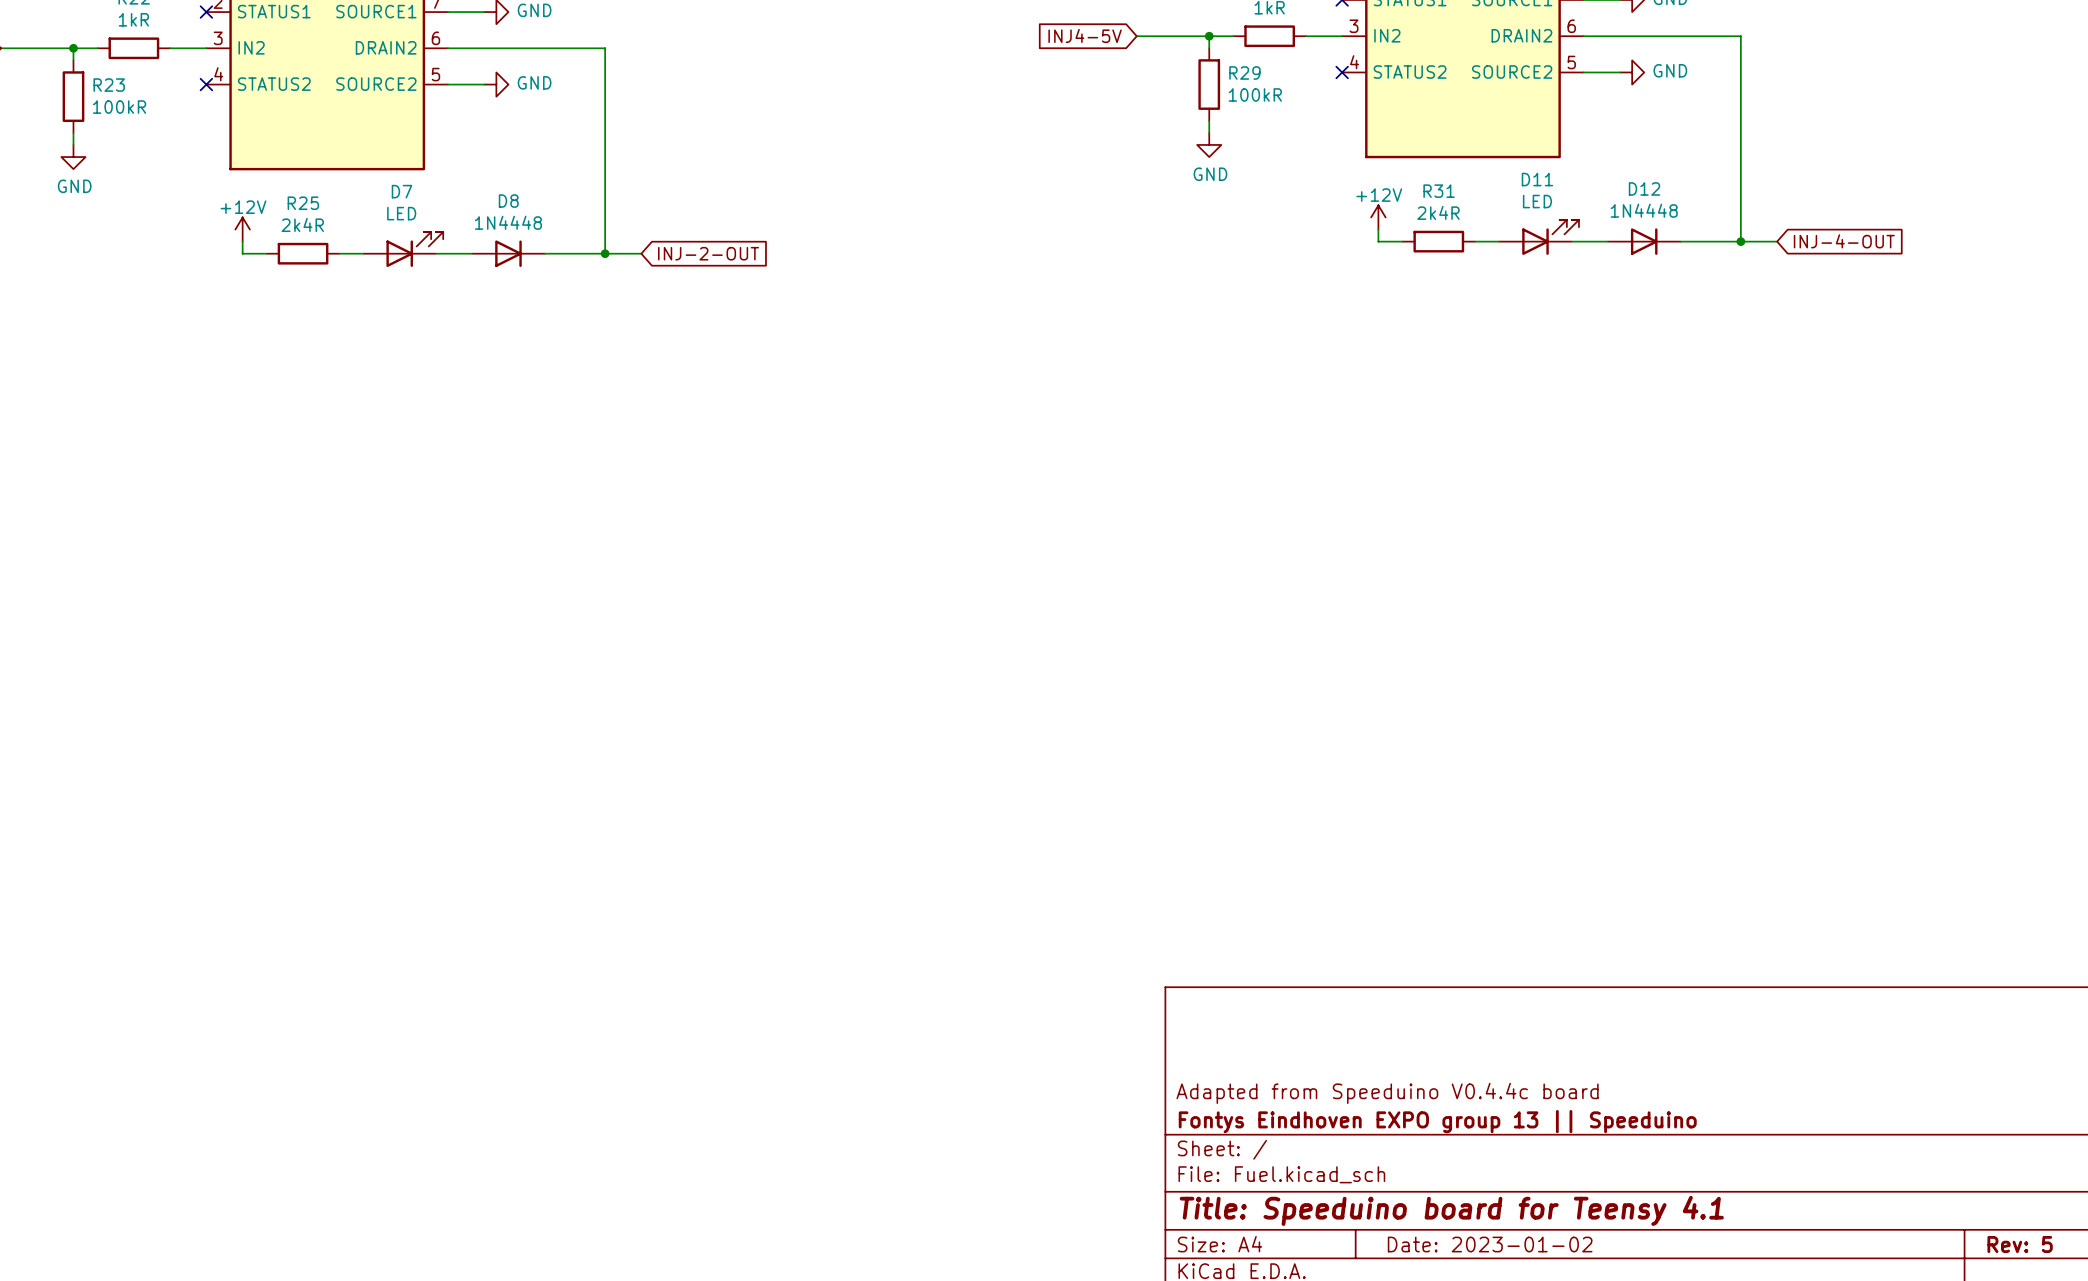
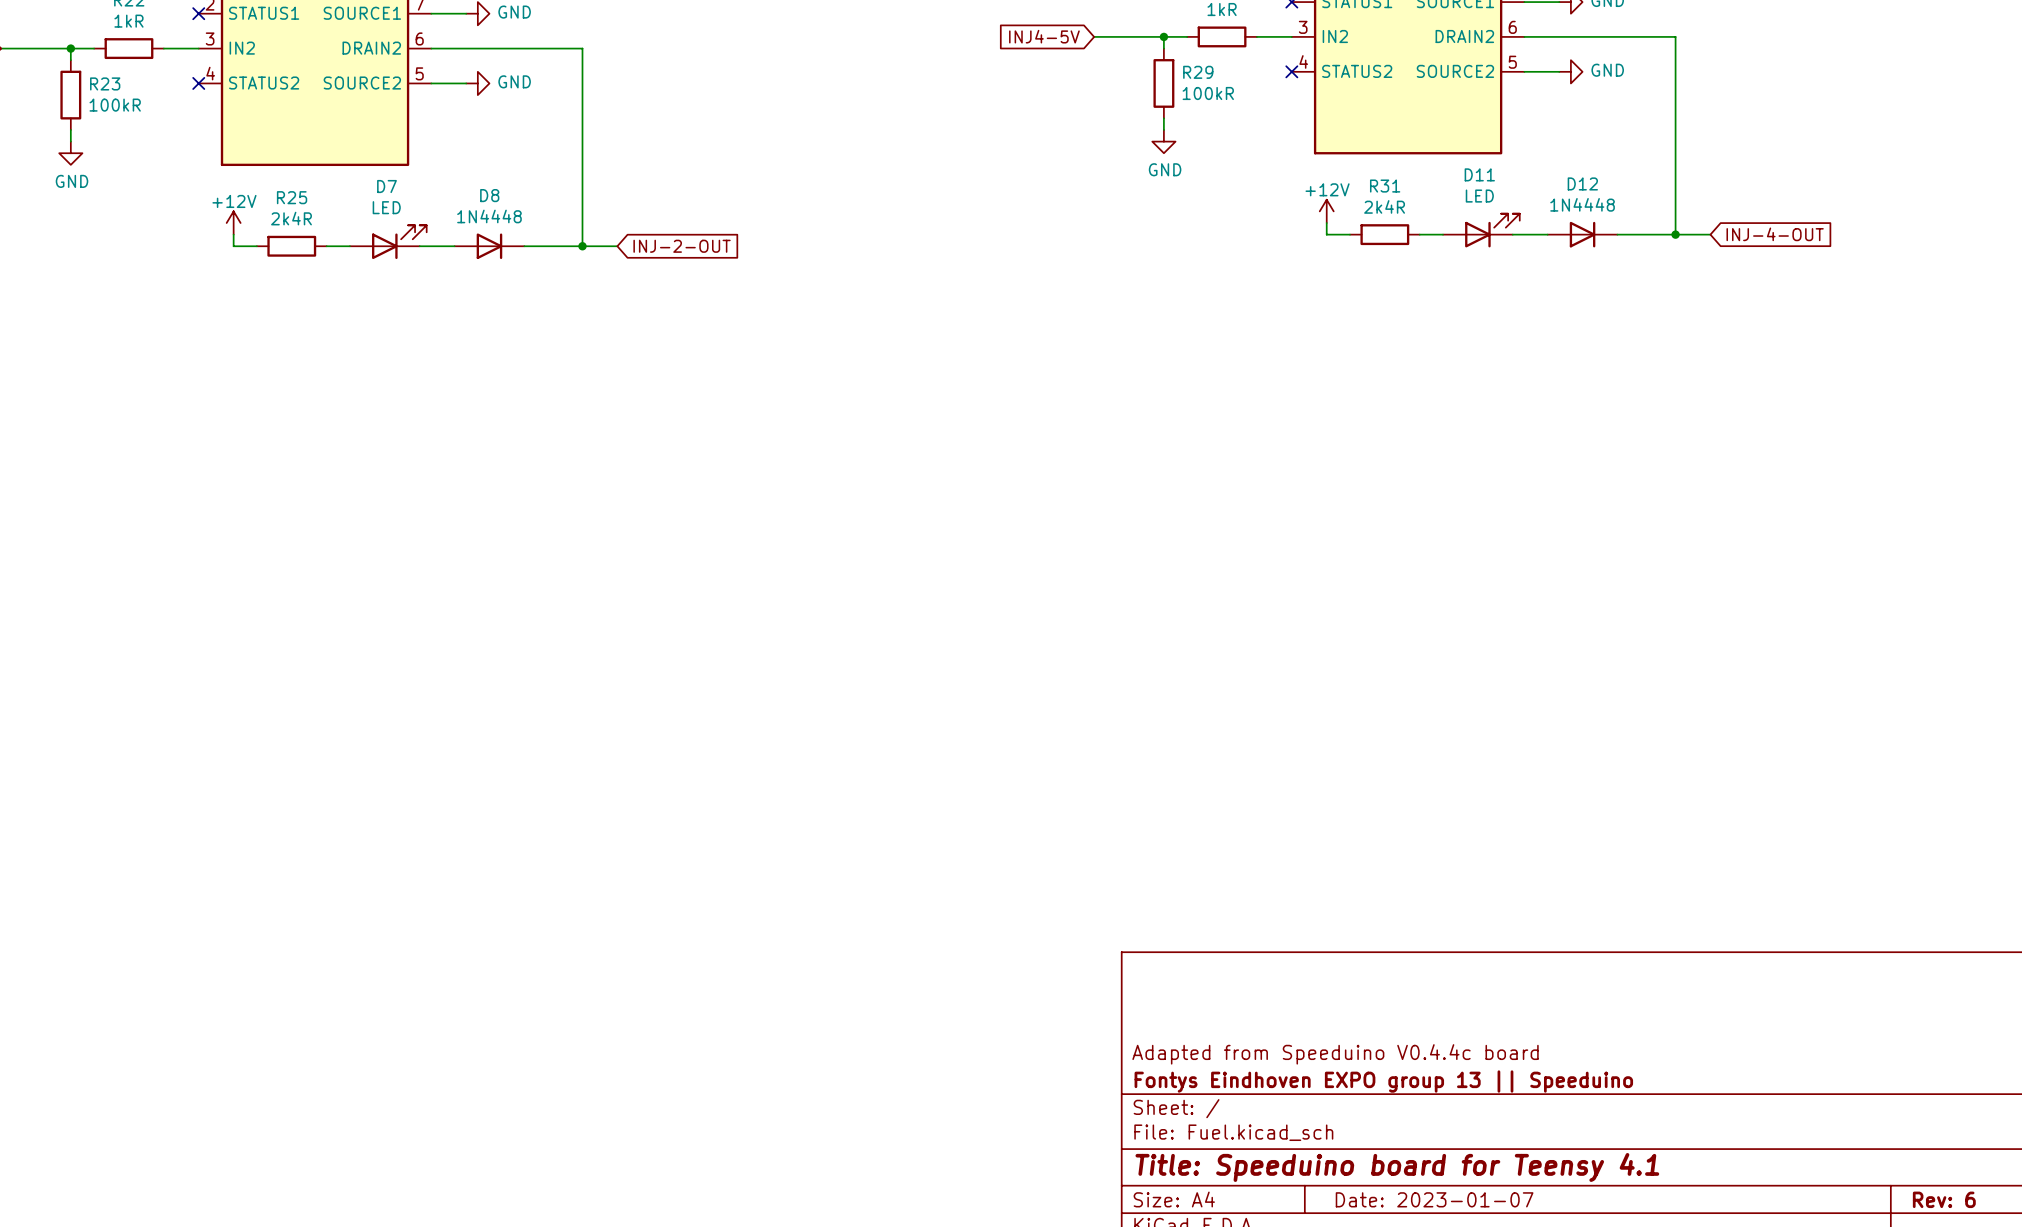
title block: Date: 2023-01-02 (1490, 1244) -> Date: 2023-01-07 (1434, 1199)
title block: Rev: 5 (2020, 1244) -> Rev: 6 (1944, 1199)

